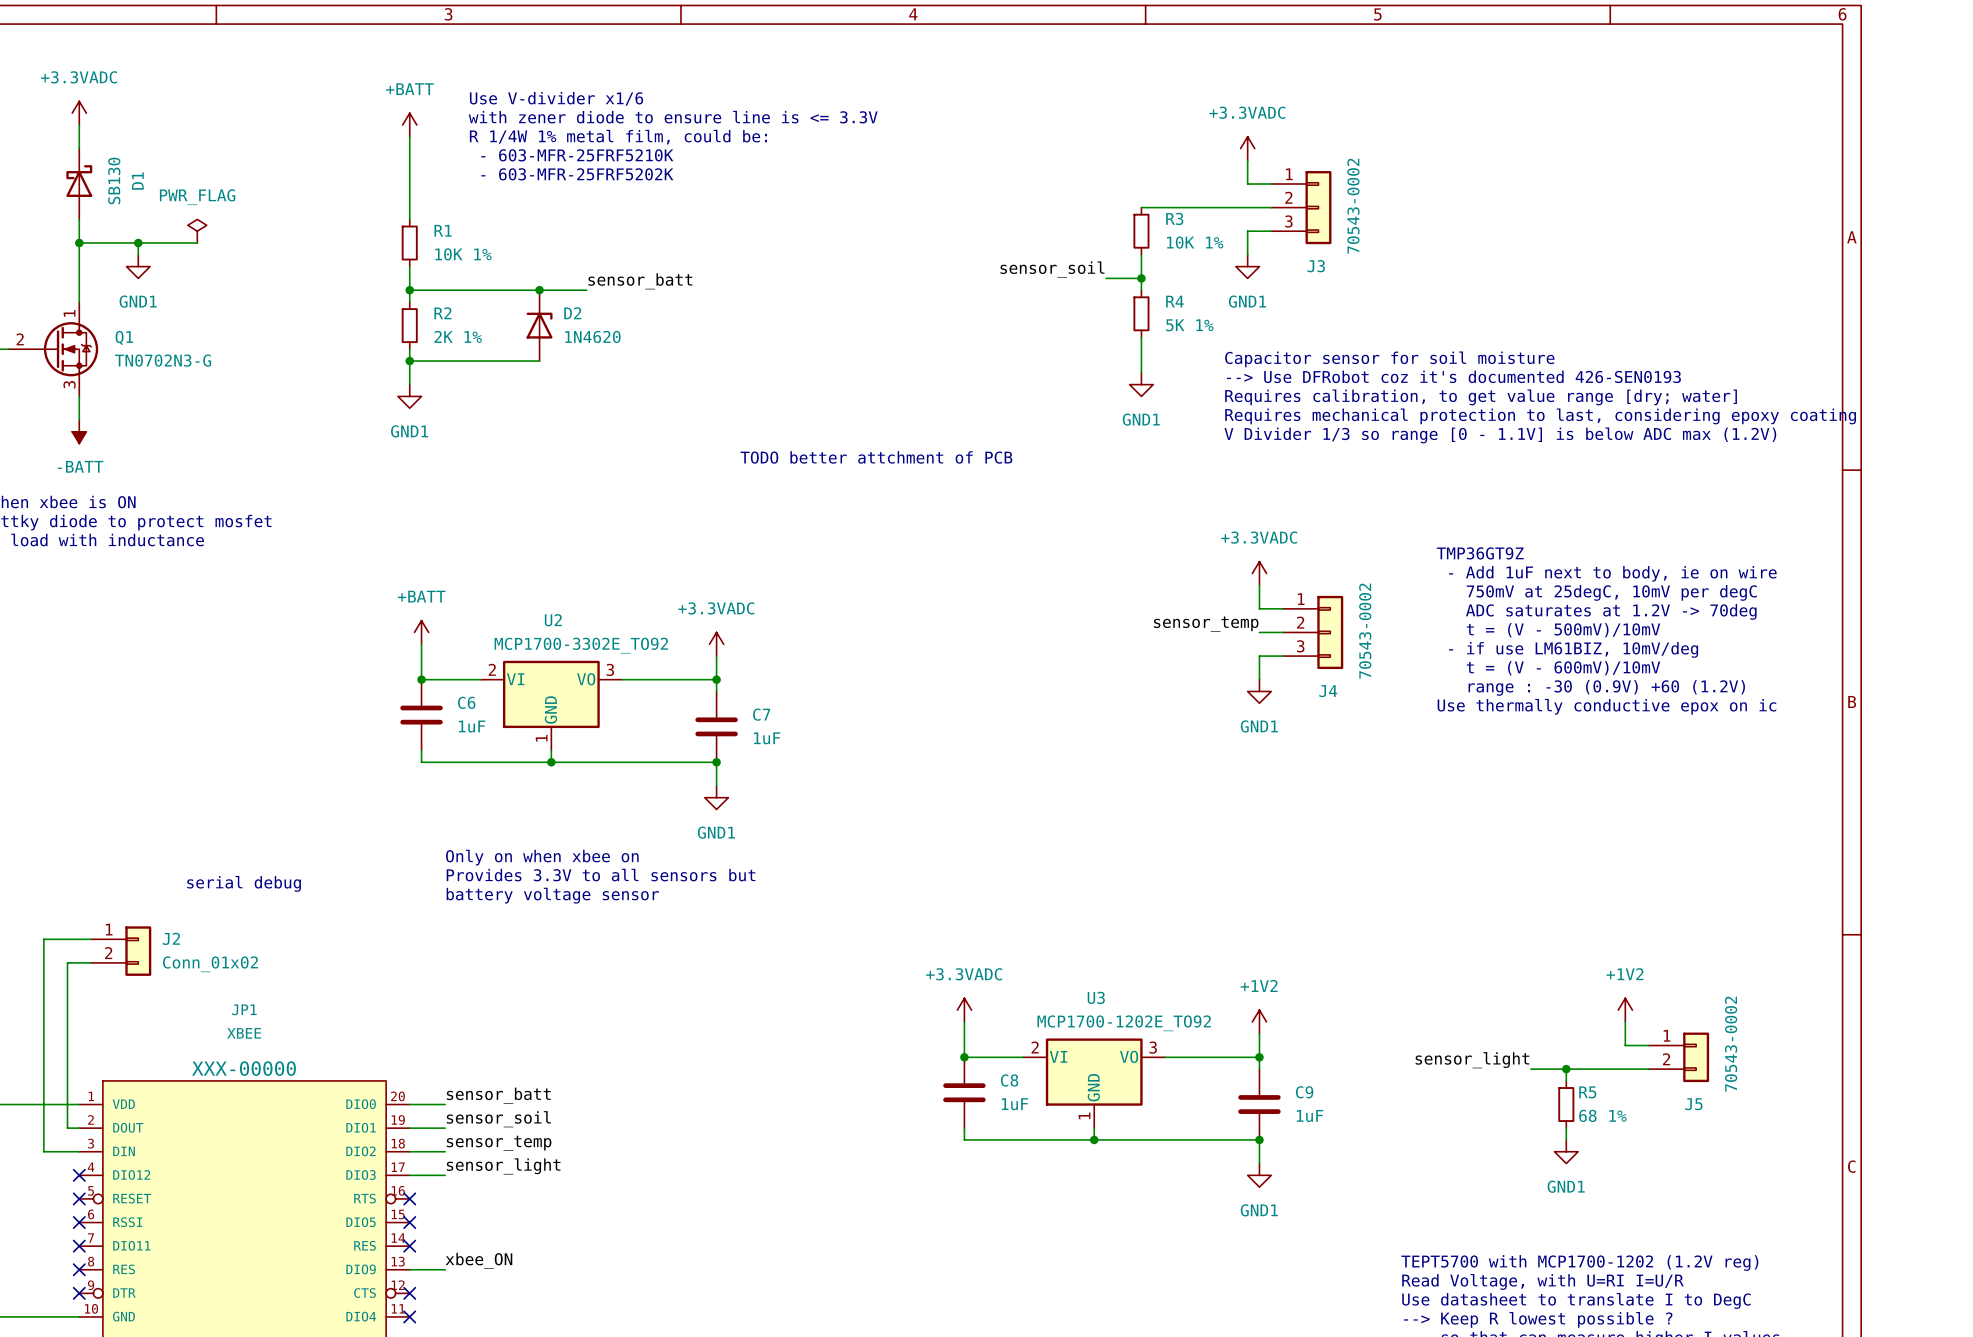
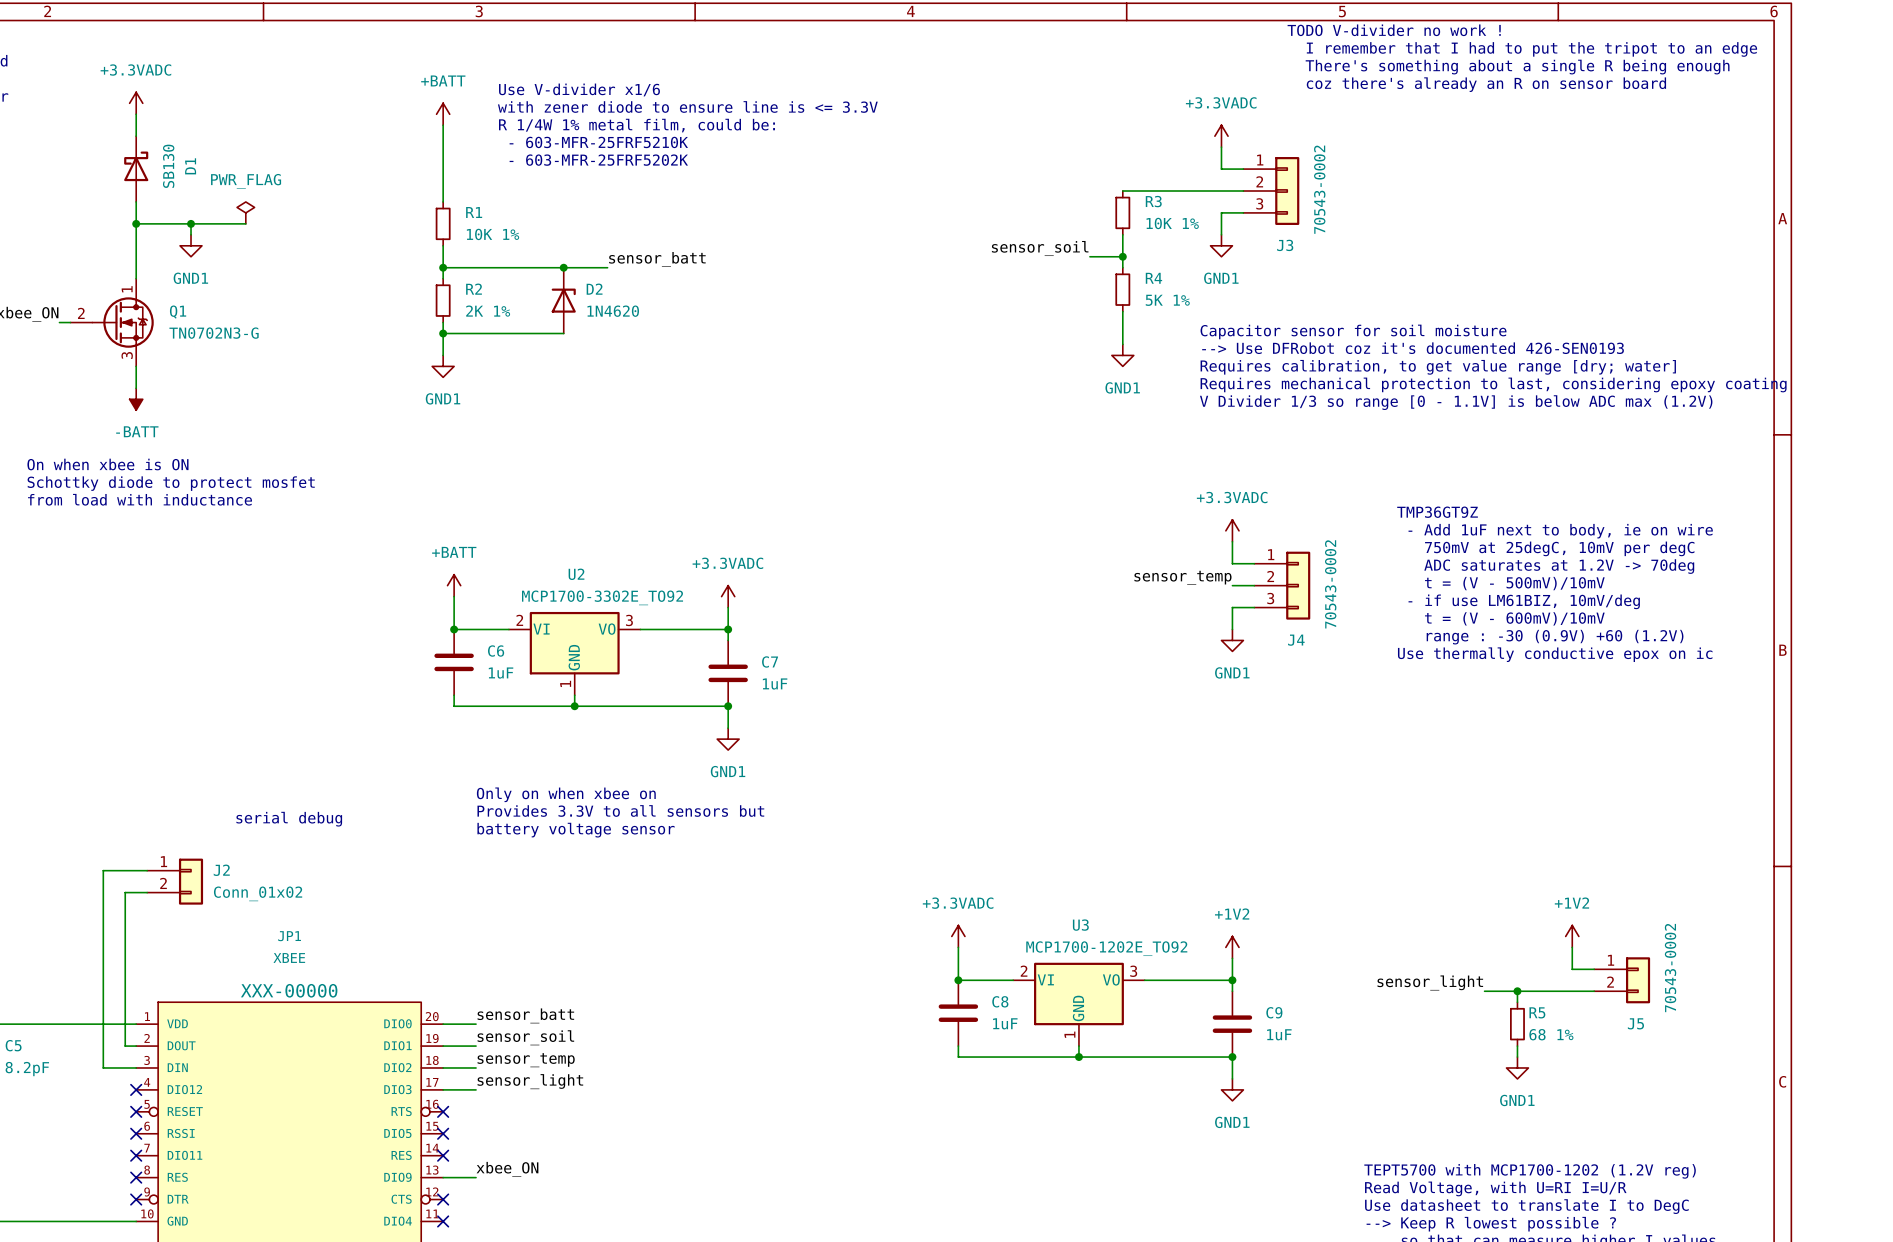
text: none -> TODO V-divider no work ! (1394, 30)
text: none -> I remember that I had to put the tripot to an edge (1531, 49)
text: none -> There's something about a single R being enough (1517, 67)
text: none -> coz there's already an R on sensor board (1486, 84)
text: TODO better attchment of PCB (876, 457) -> none

